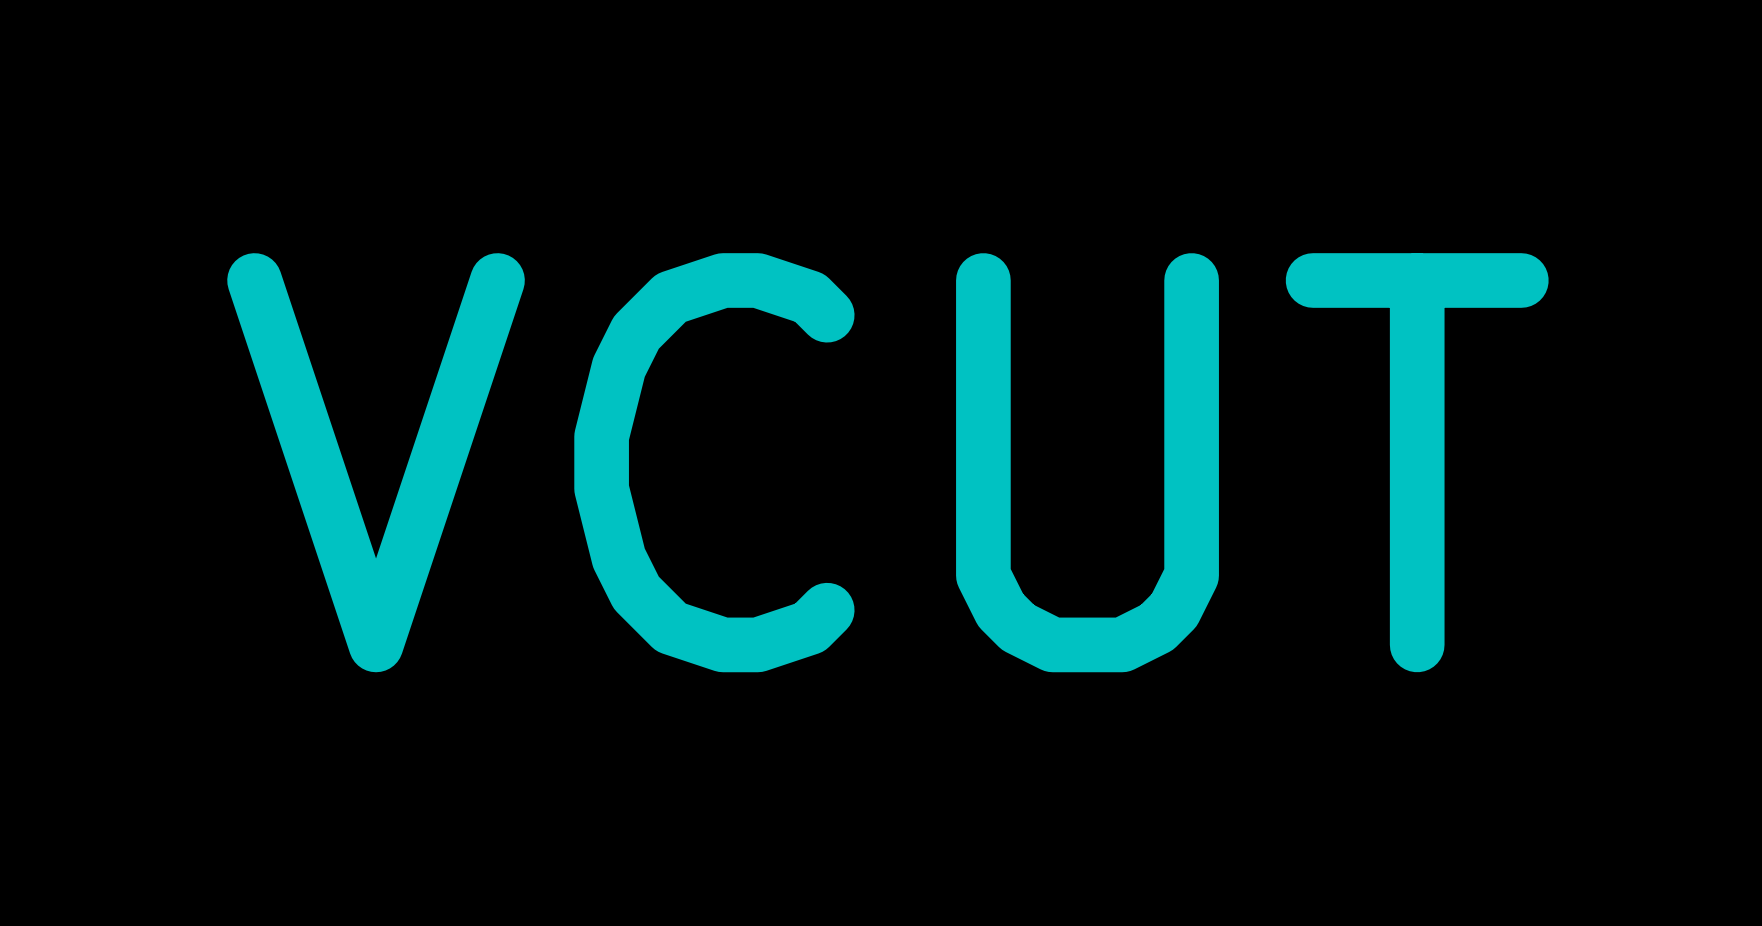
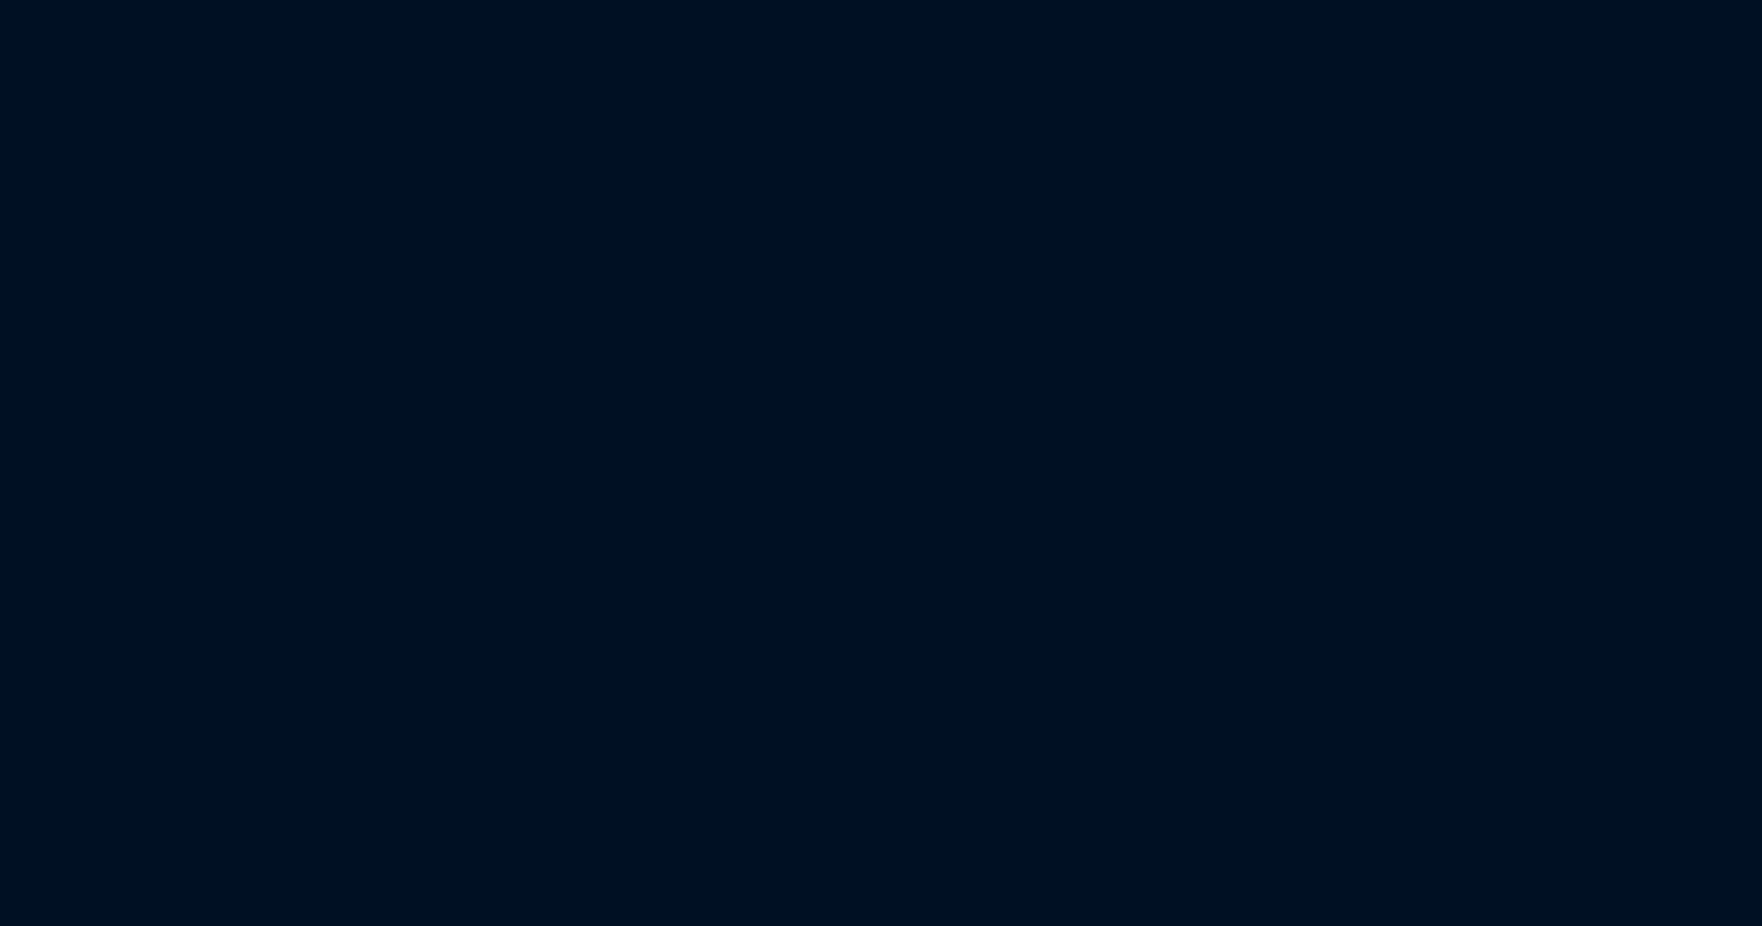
text: VCUT (887, 462) -> none

